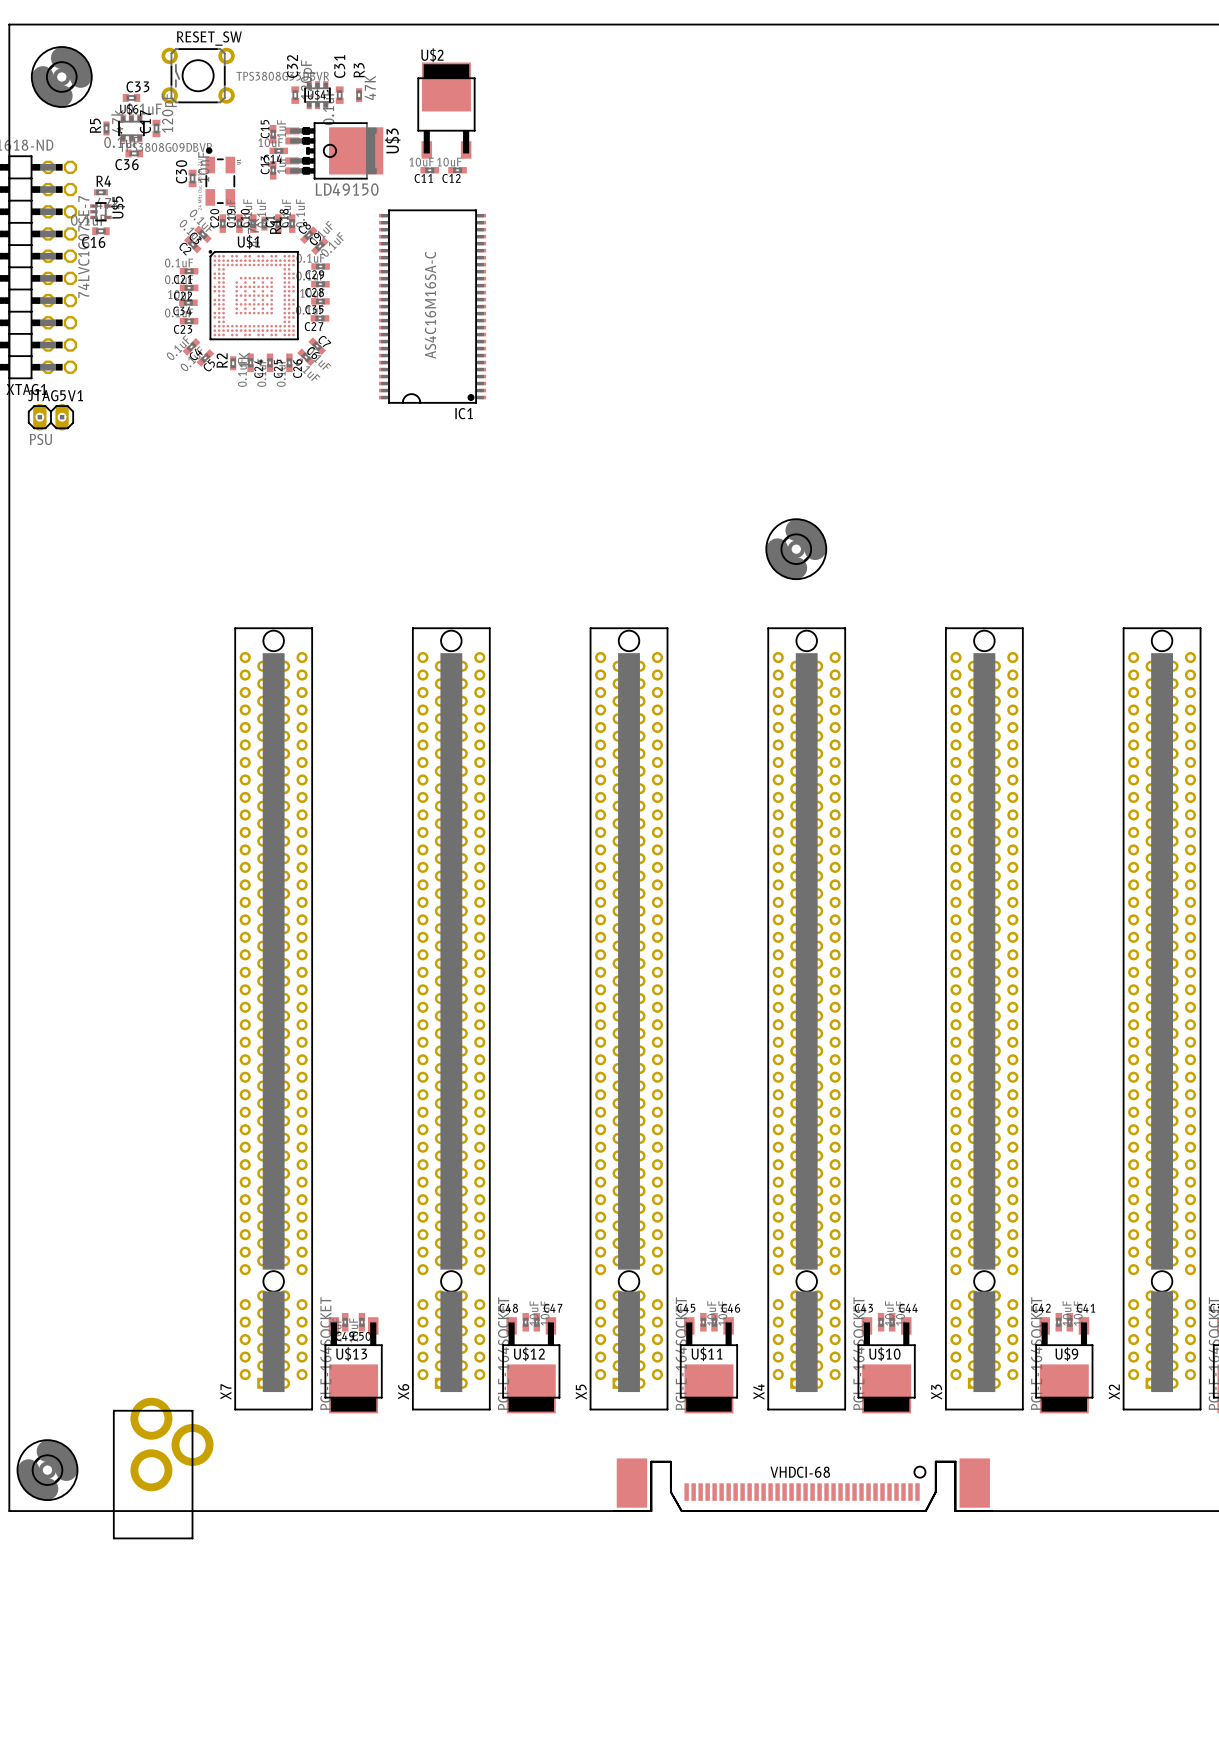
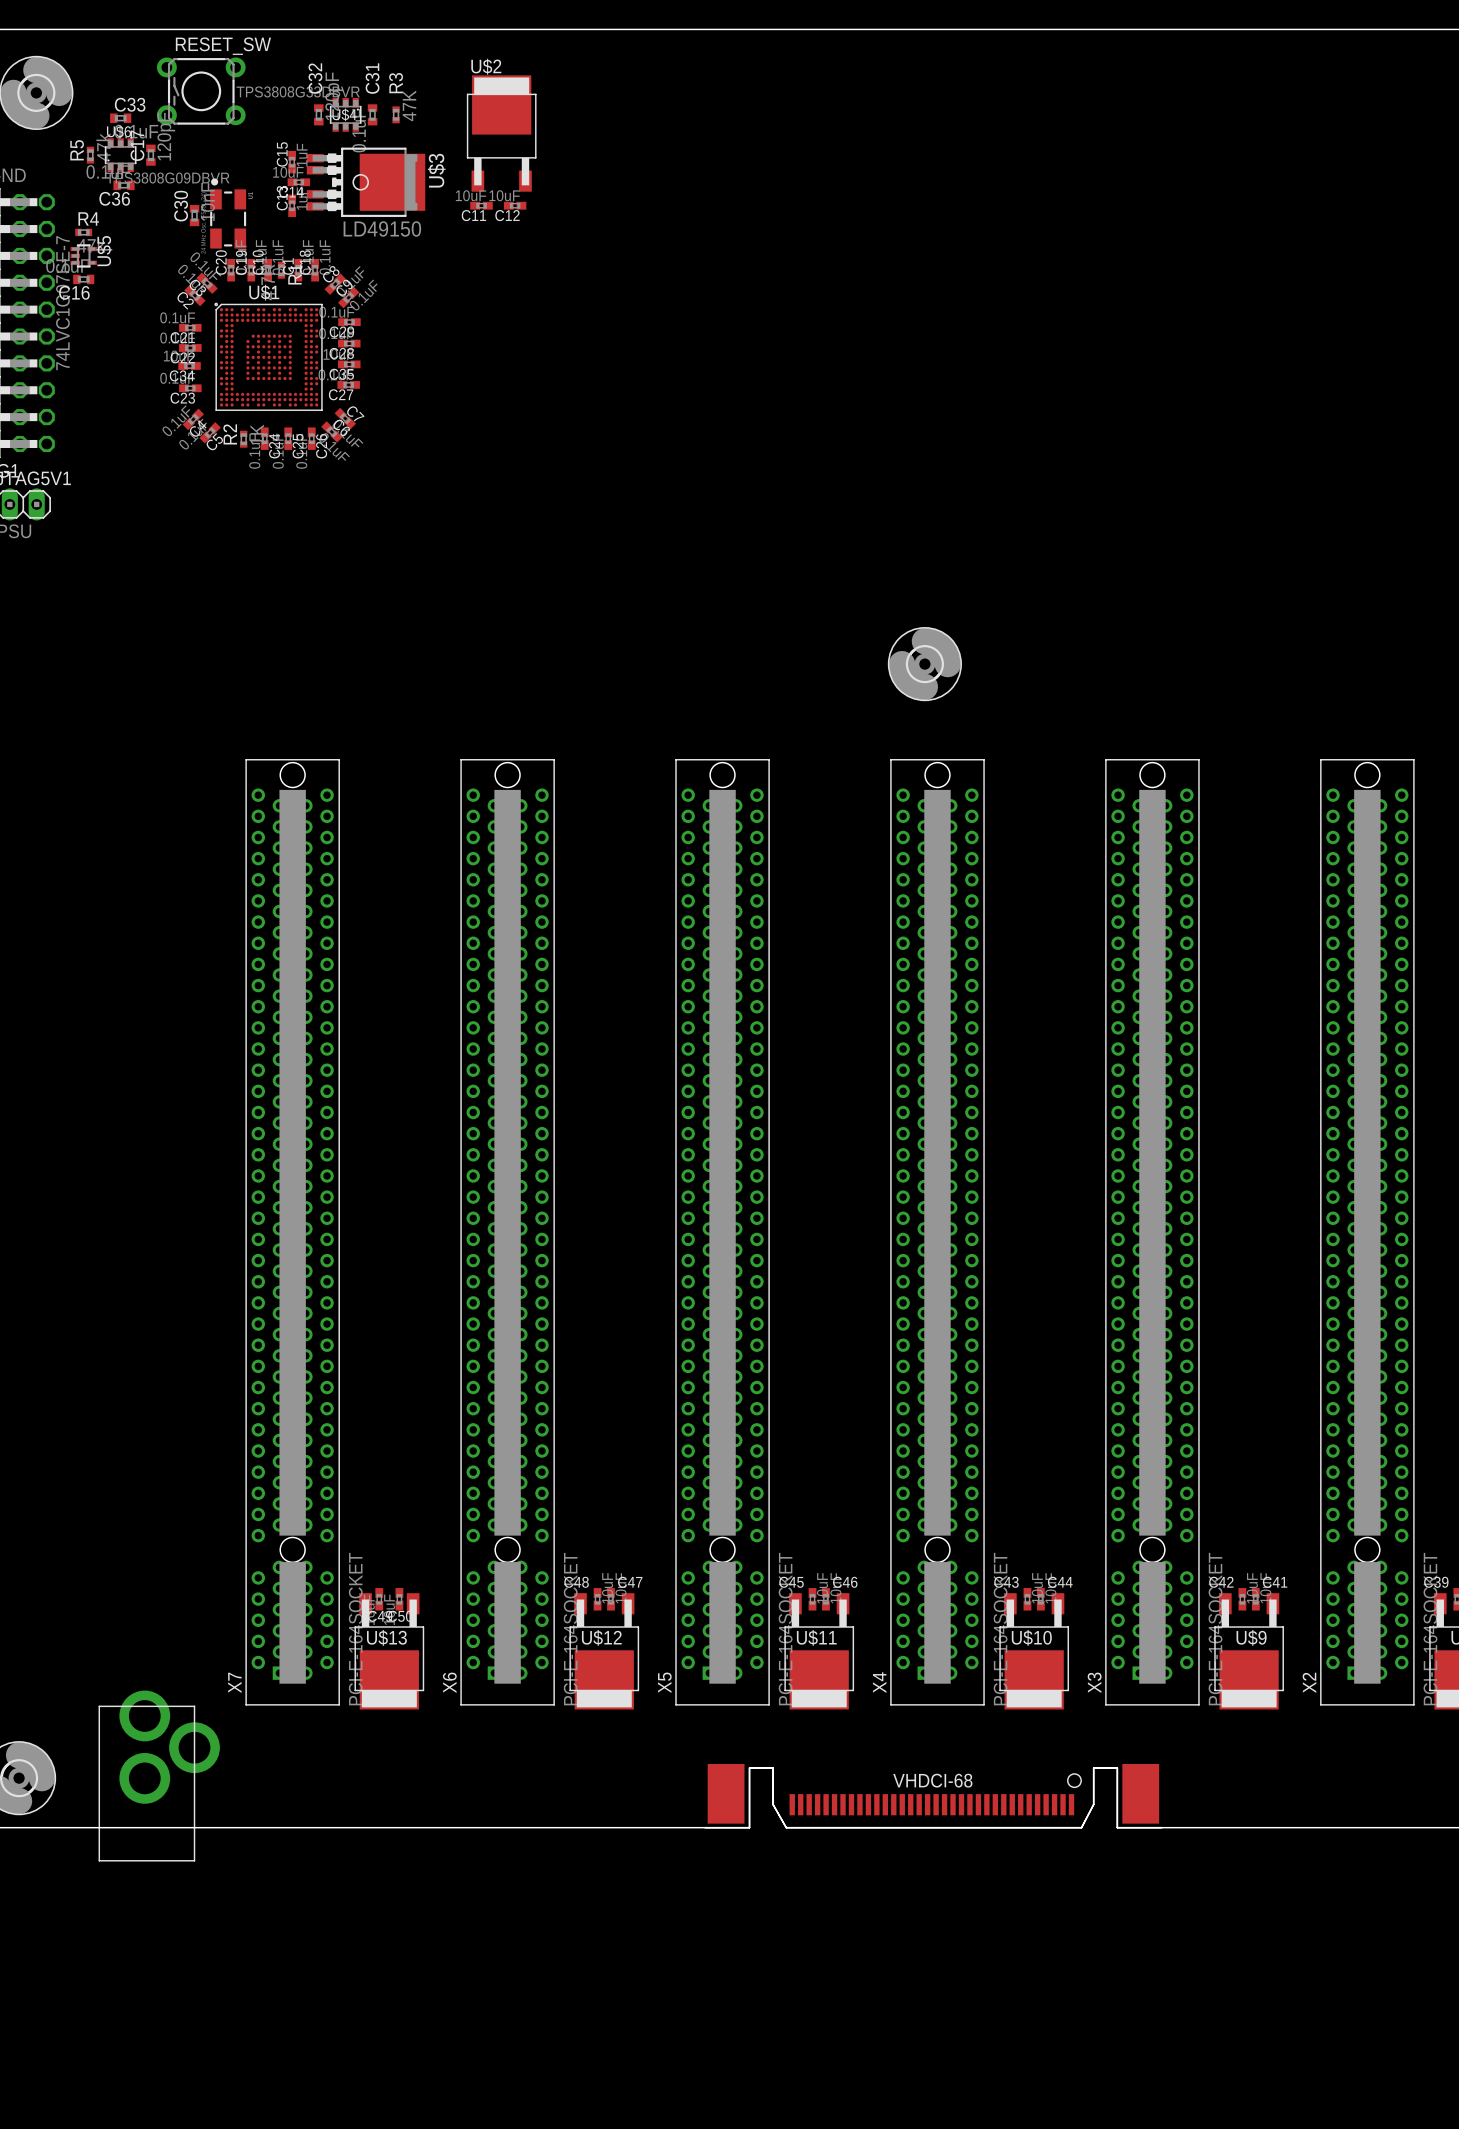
IC1: AS4C16M16SA-C (432, 306) -> none

